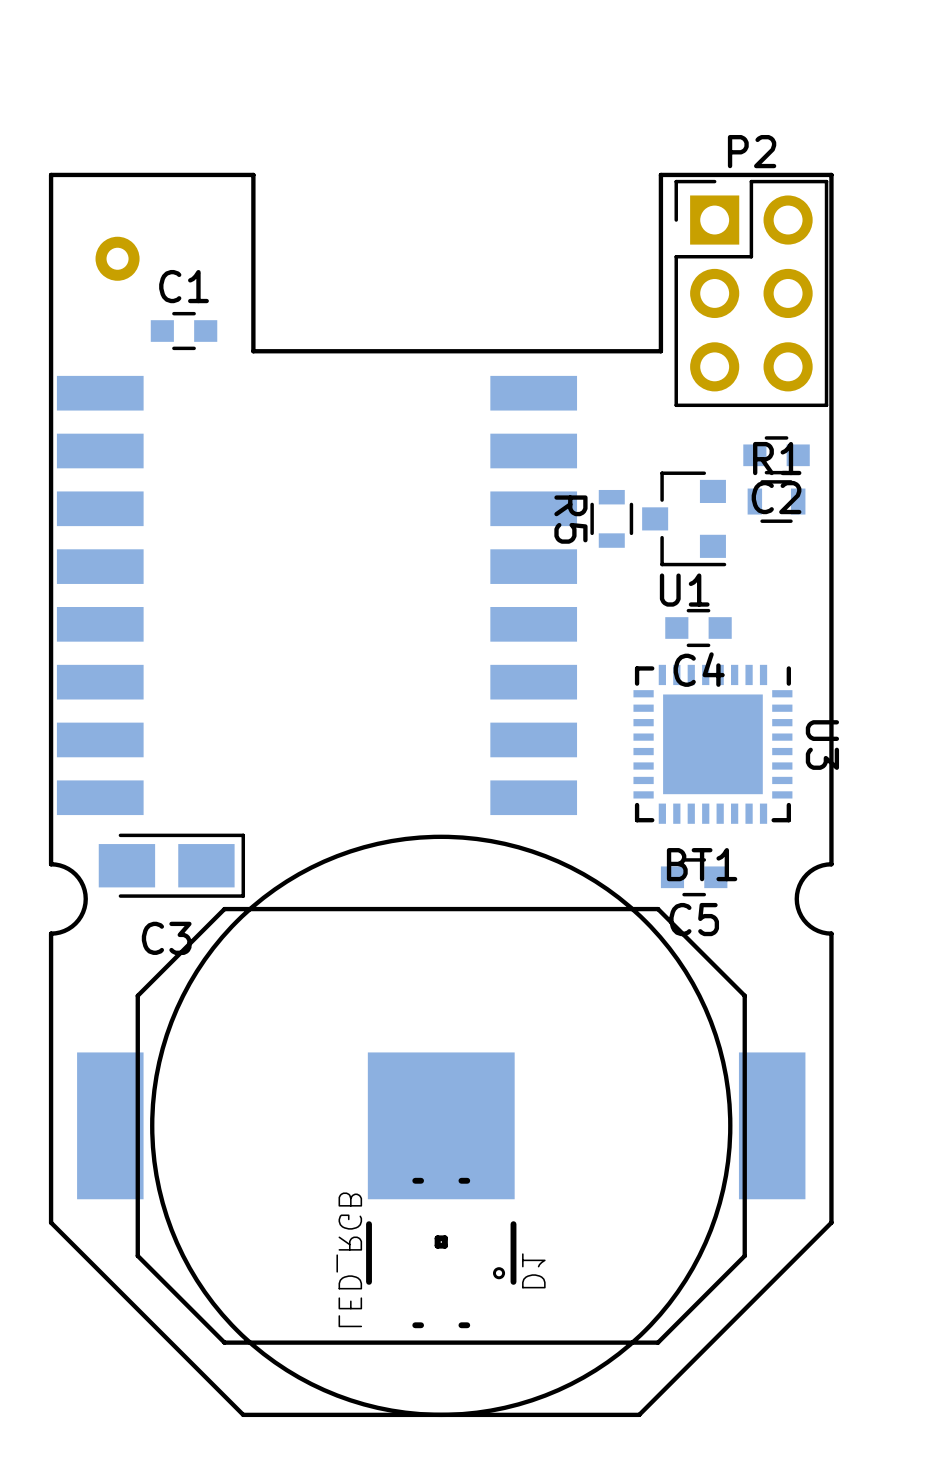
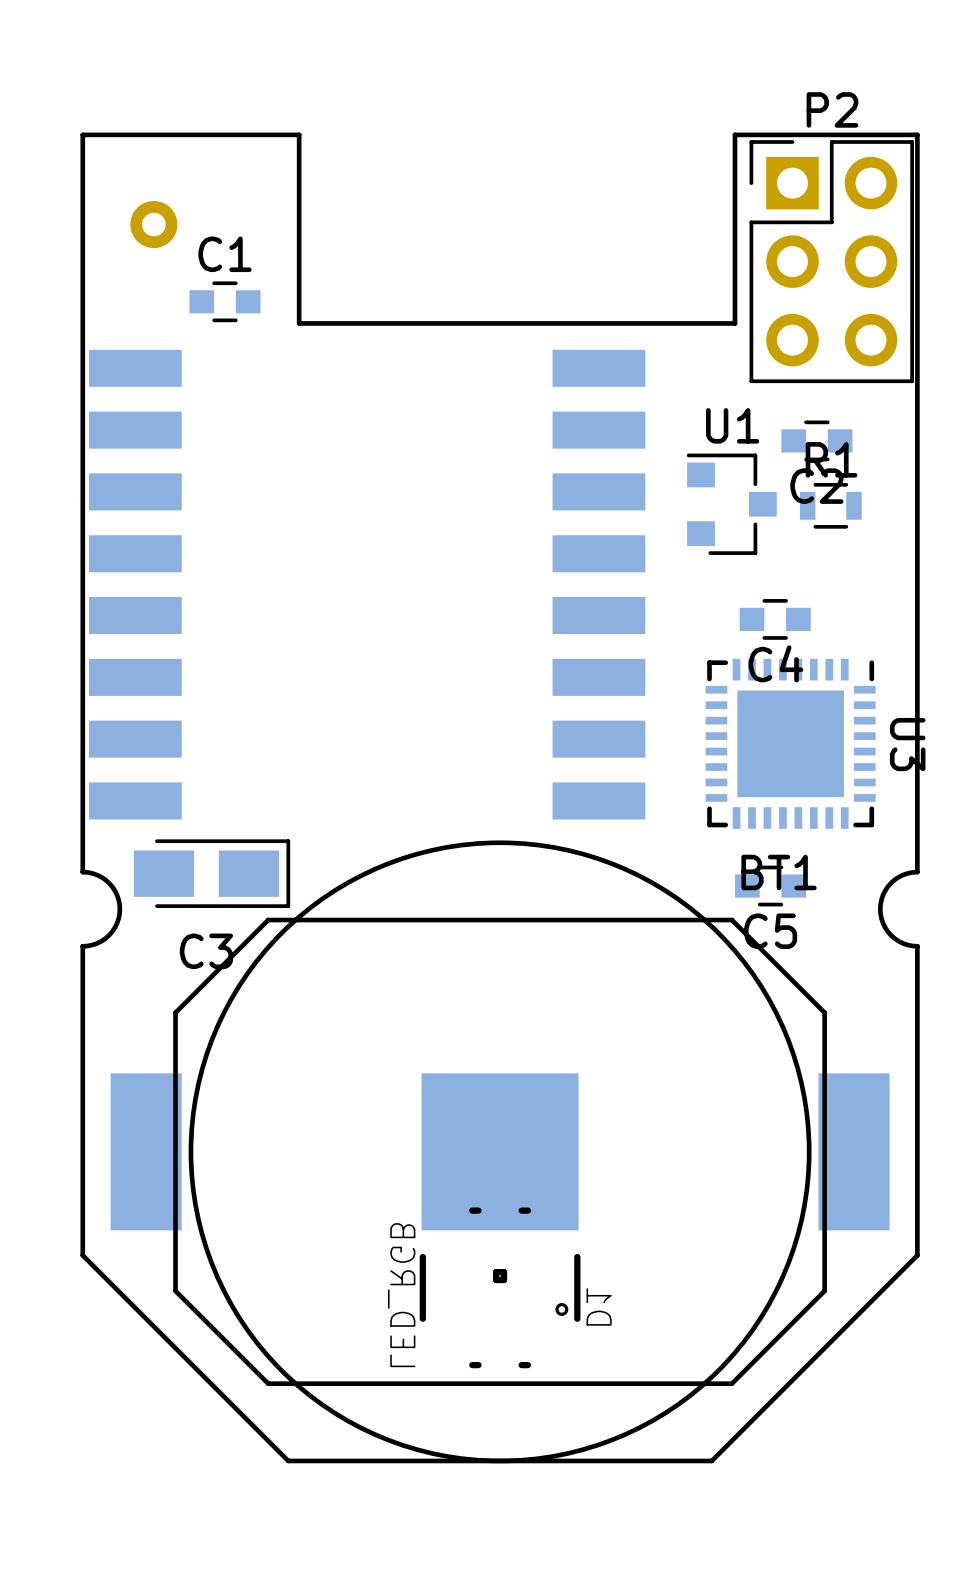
C2 position: (776, 455) -> (816, 440)
R1 position: (776, 501) -> (830, 505)
R5: (611, 518) -> none
U1 rotation: 0° (684, 518) -> 180° (731, 504)

